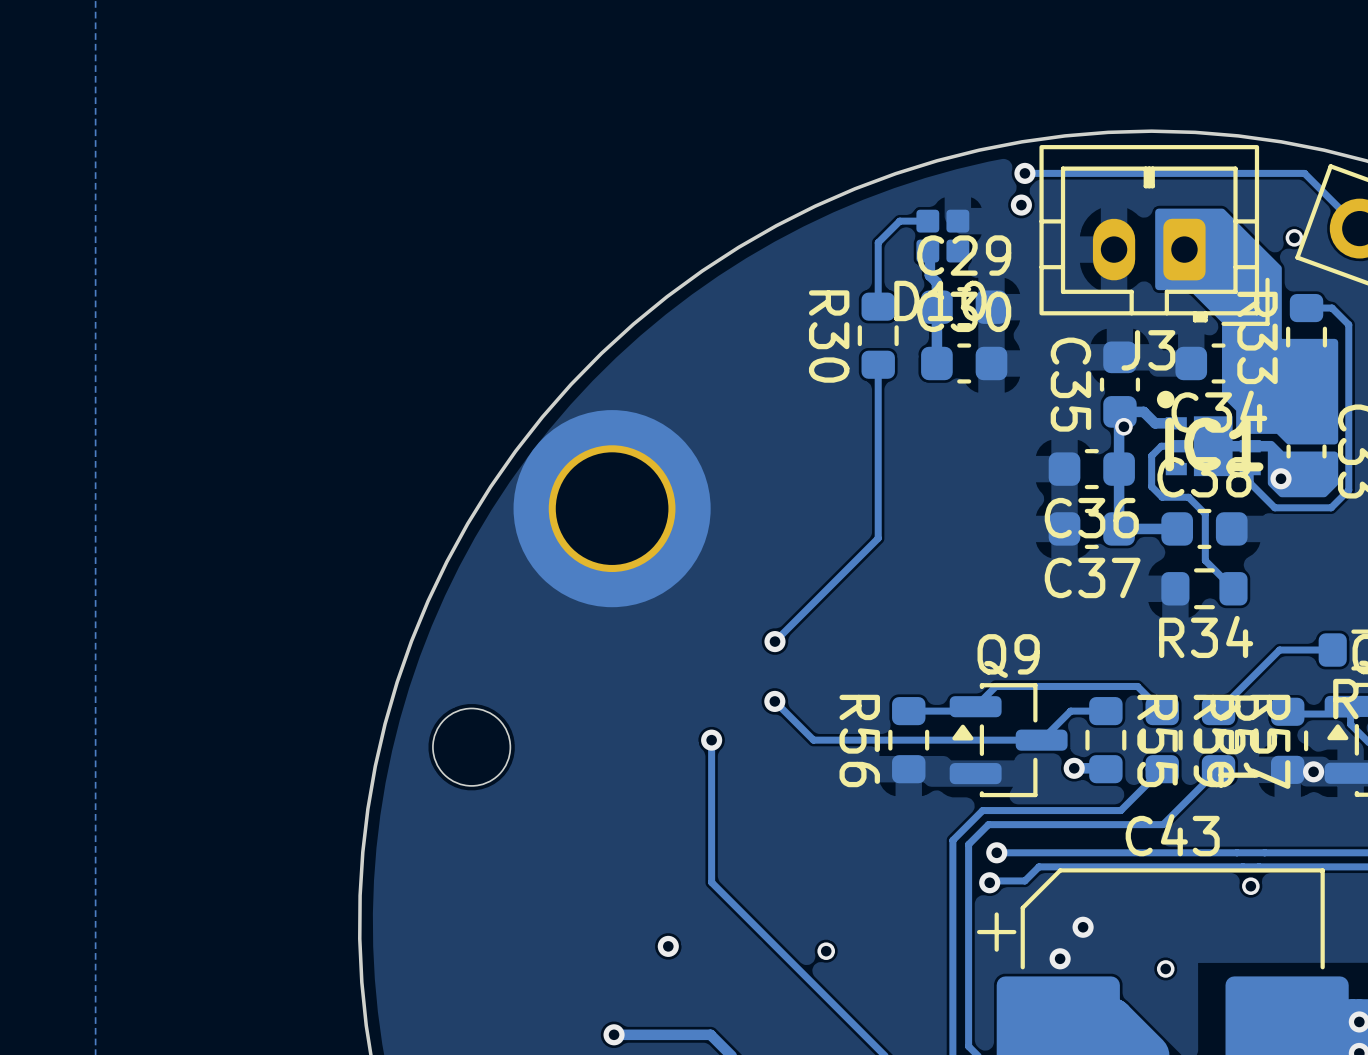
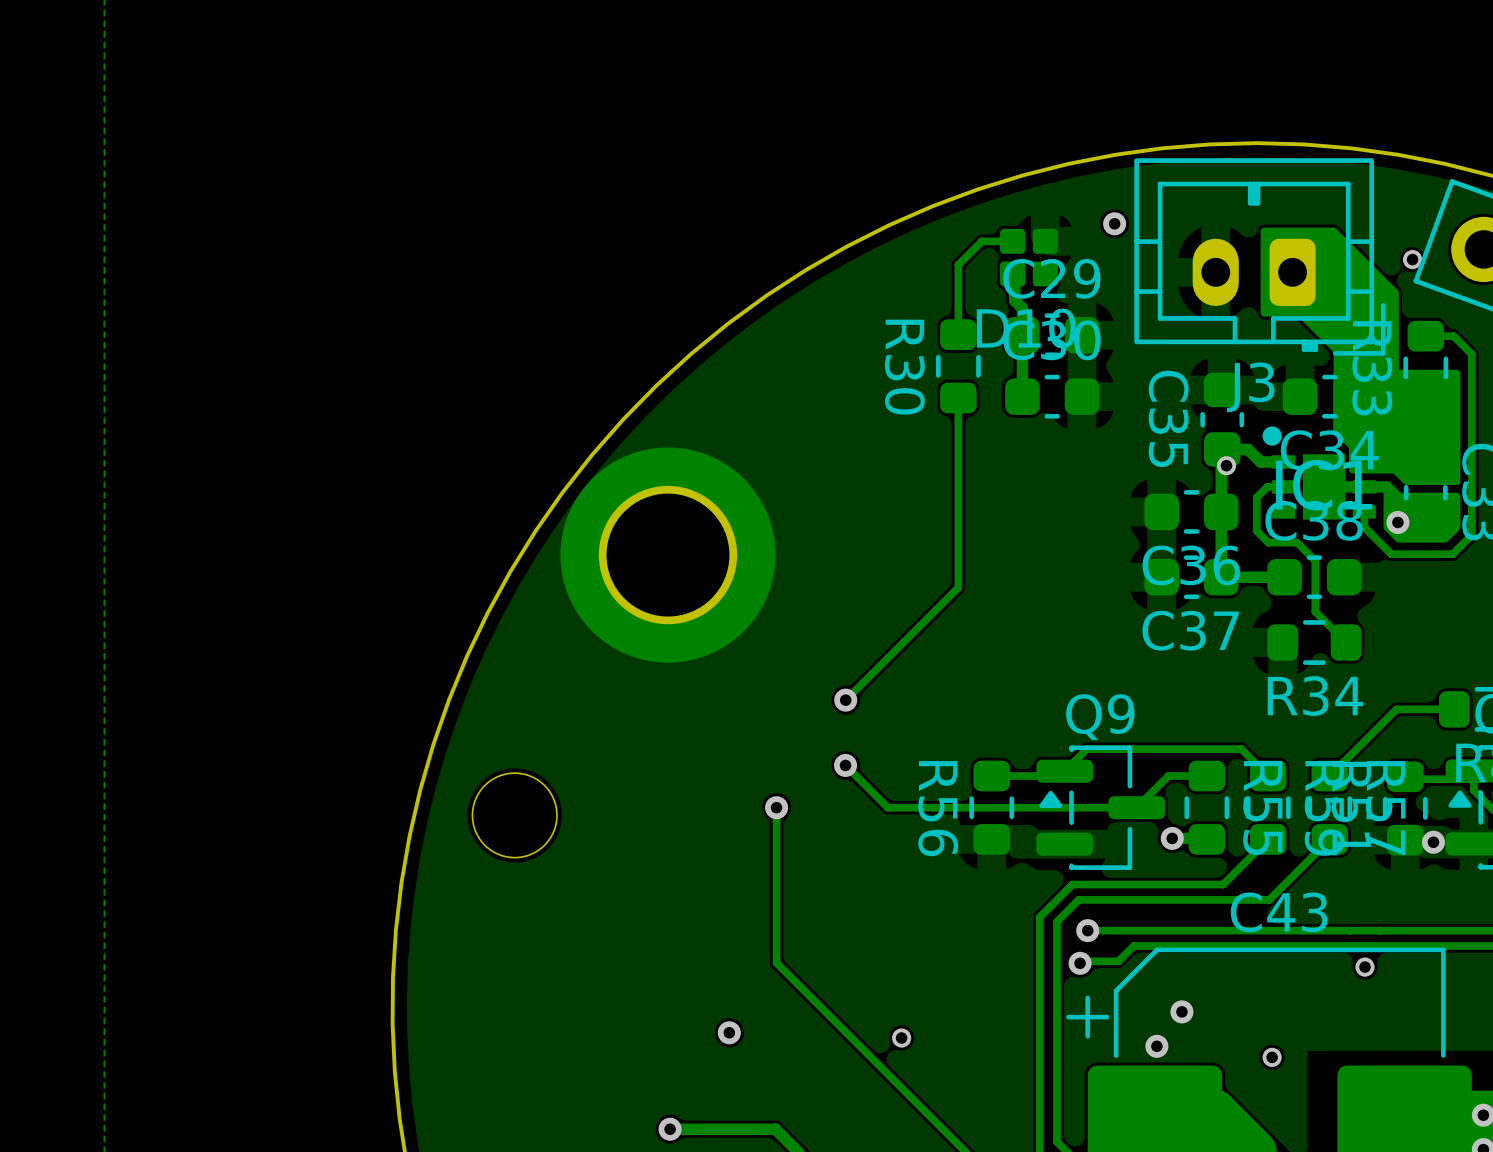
track: (1021, 173) (1304, 173) (1359, 228) -> none
via: (1024, 173) -> none

